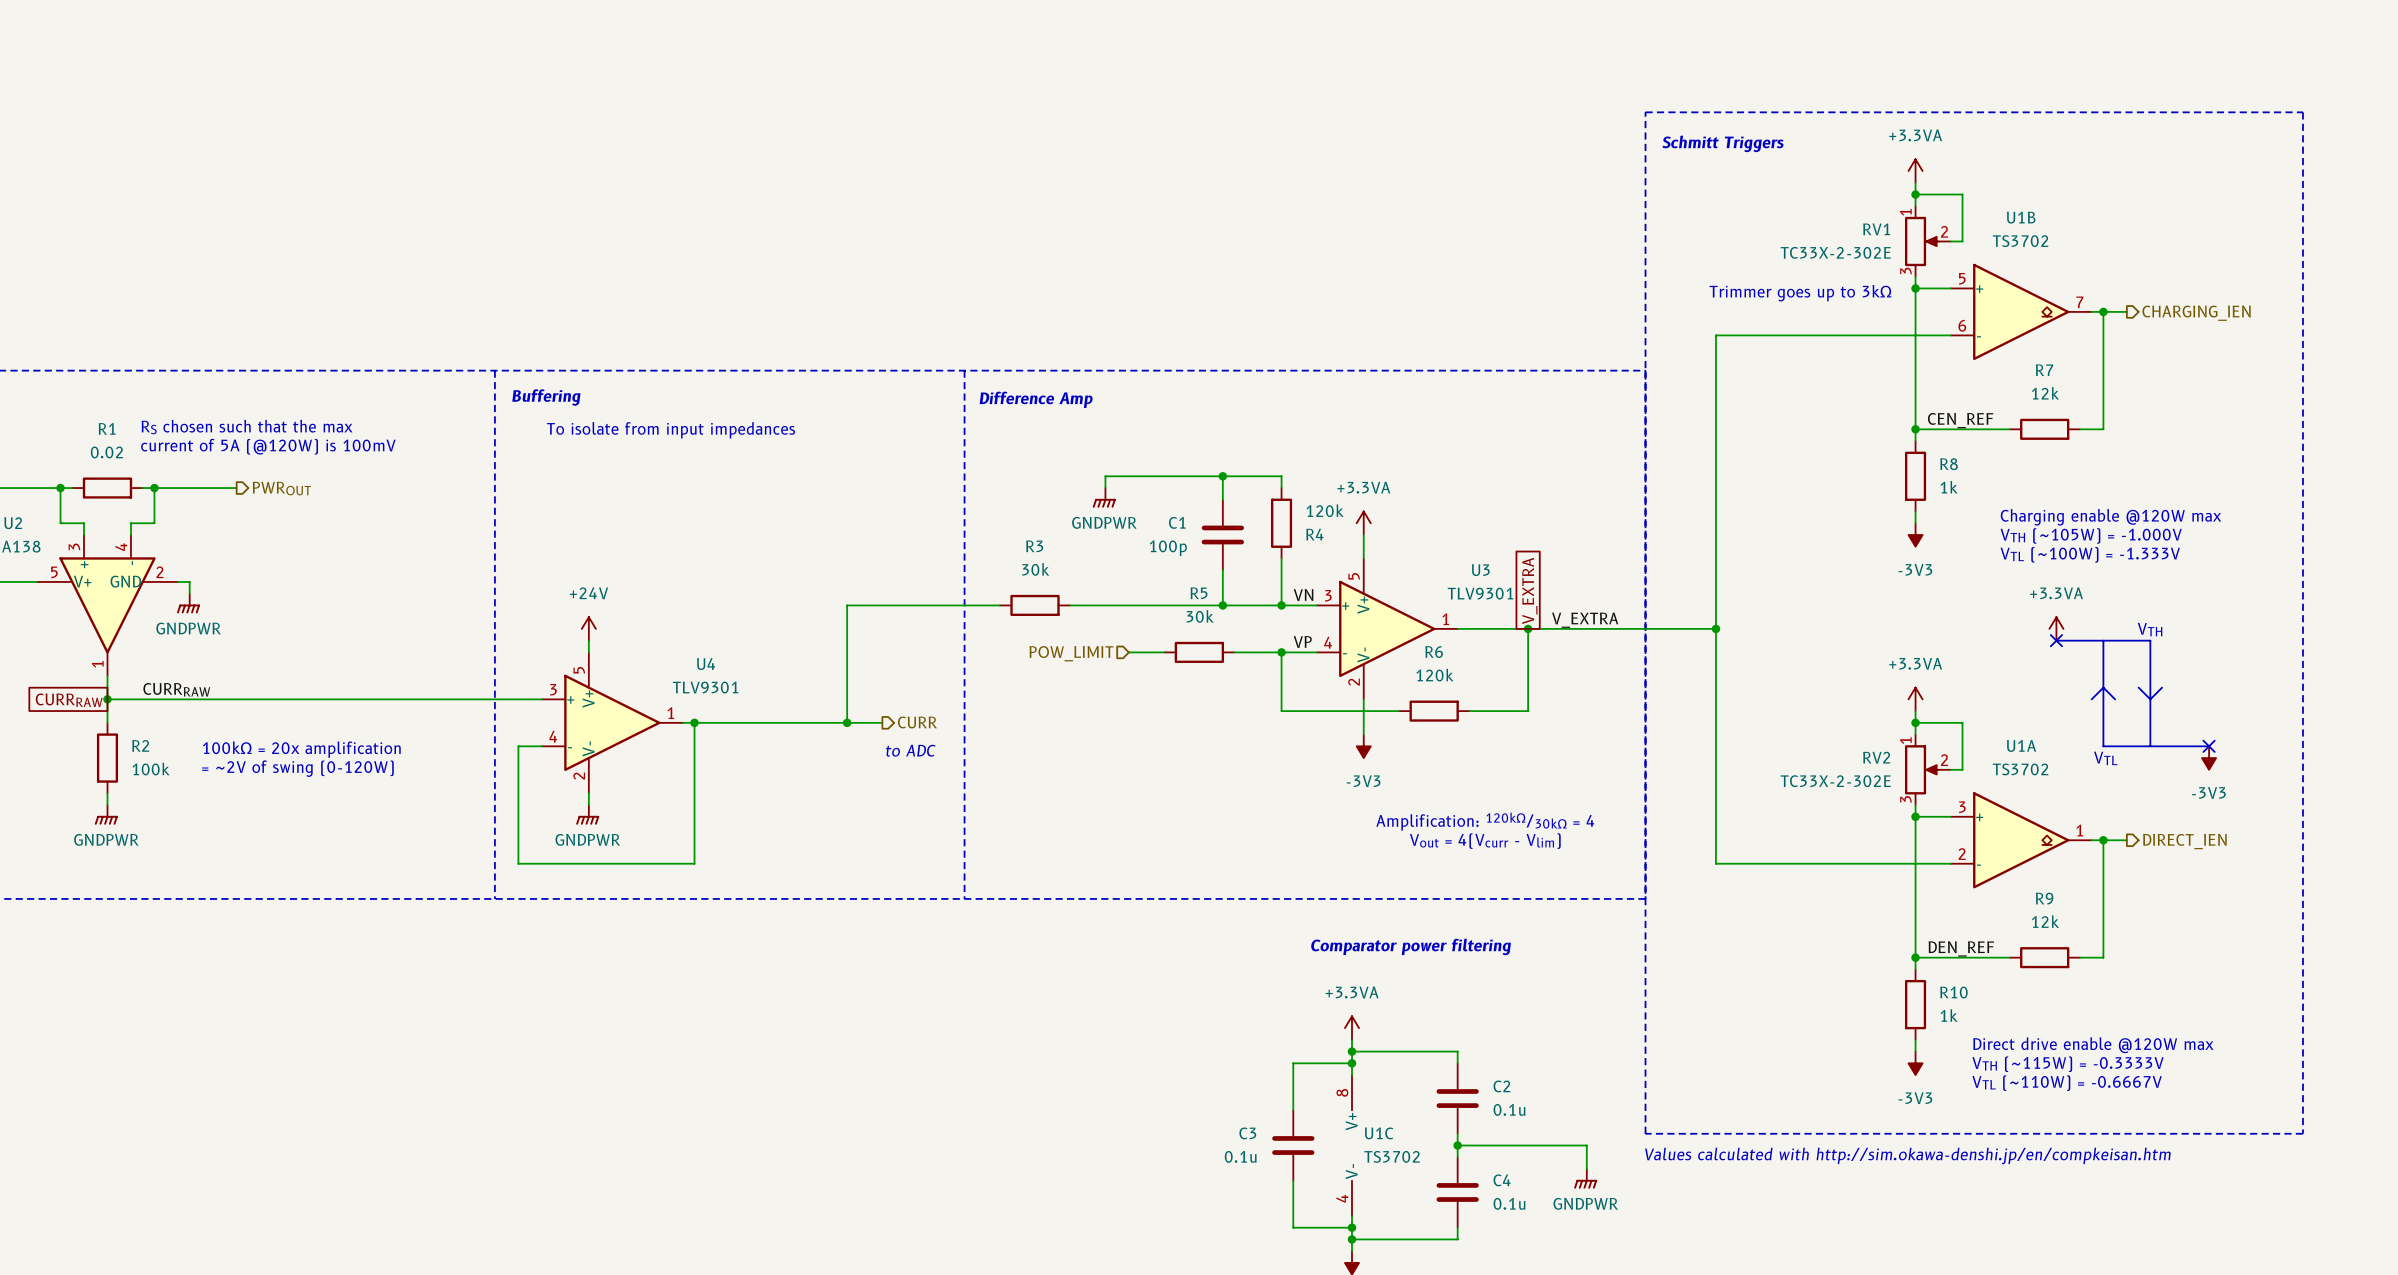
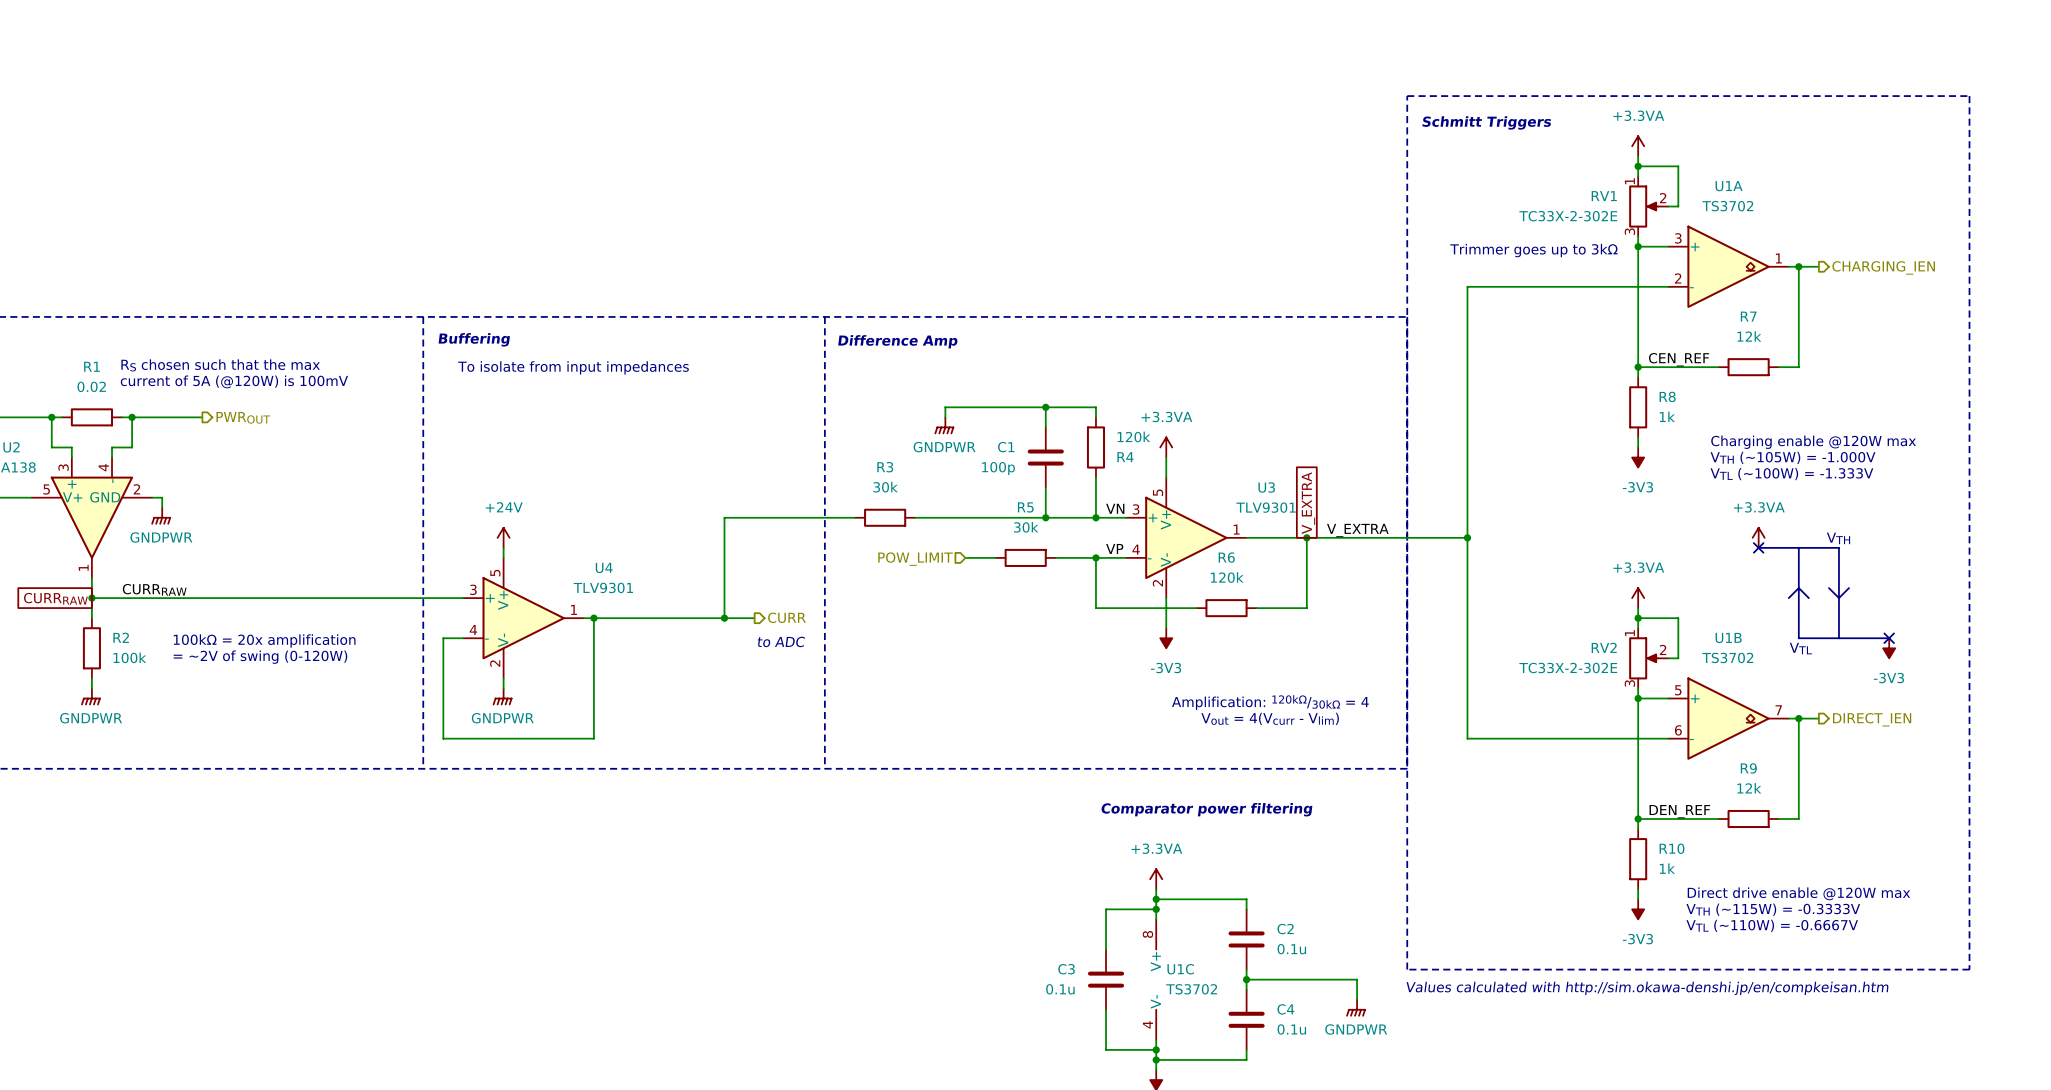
U1B position: (2021, 311) -> (1728, 718)
U1A position: (2021, 840) -> (1728, 266)

